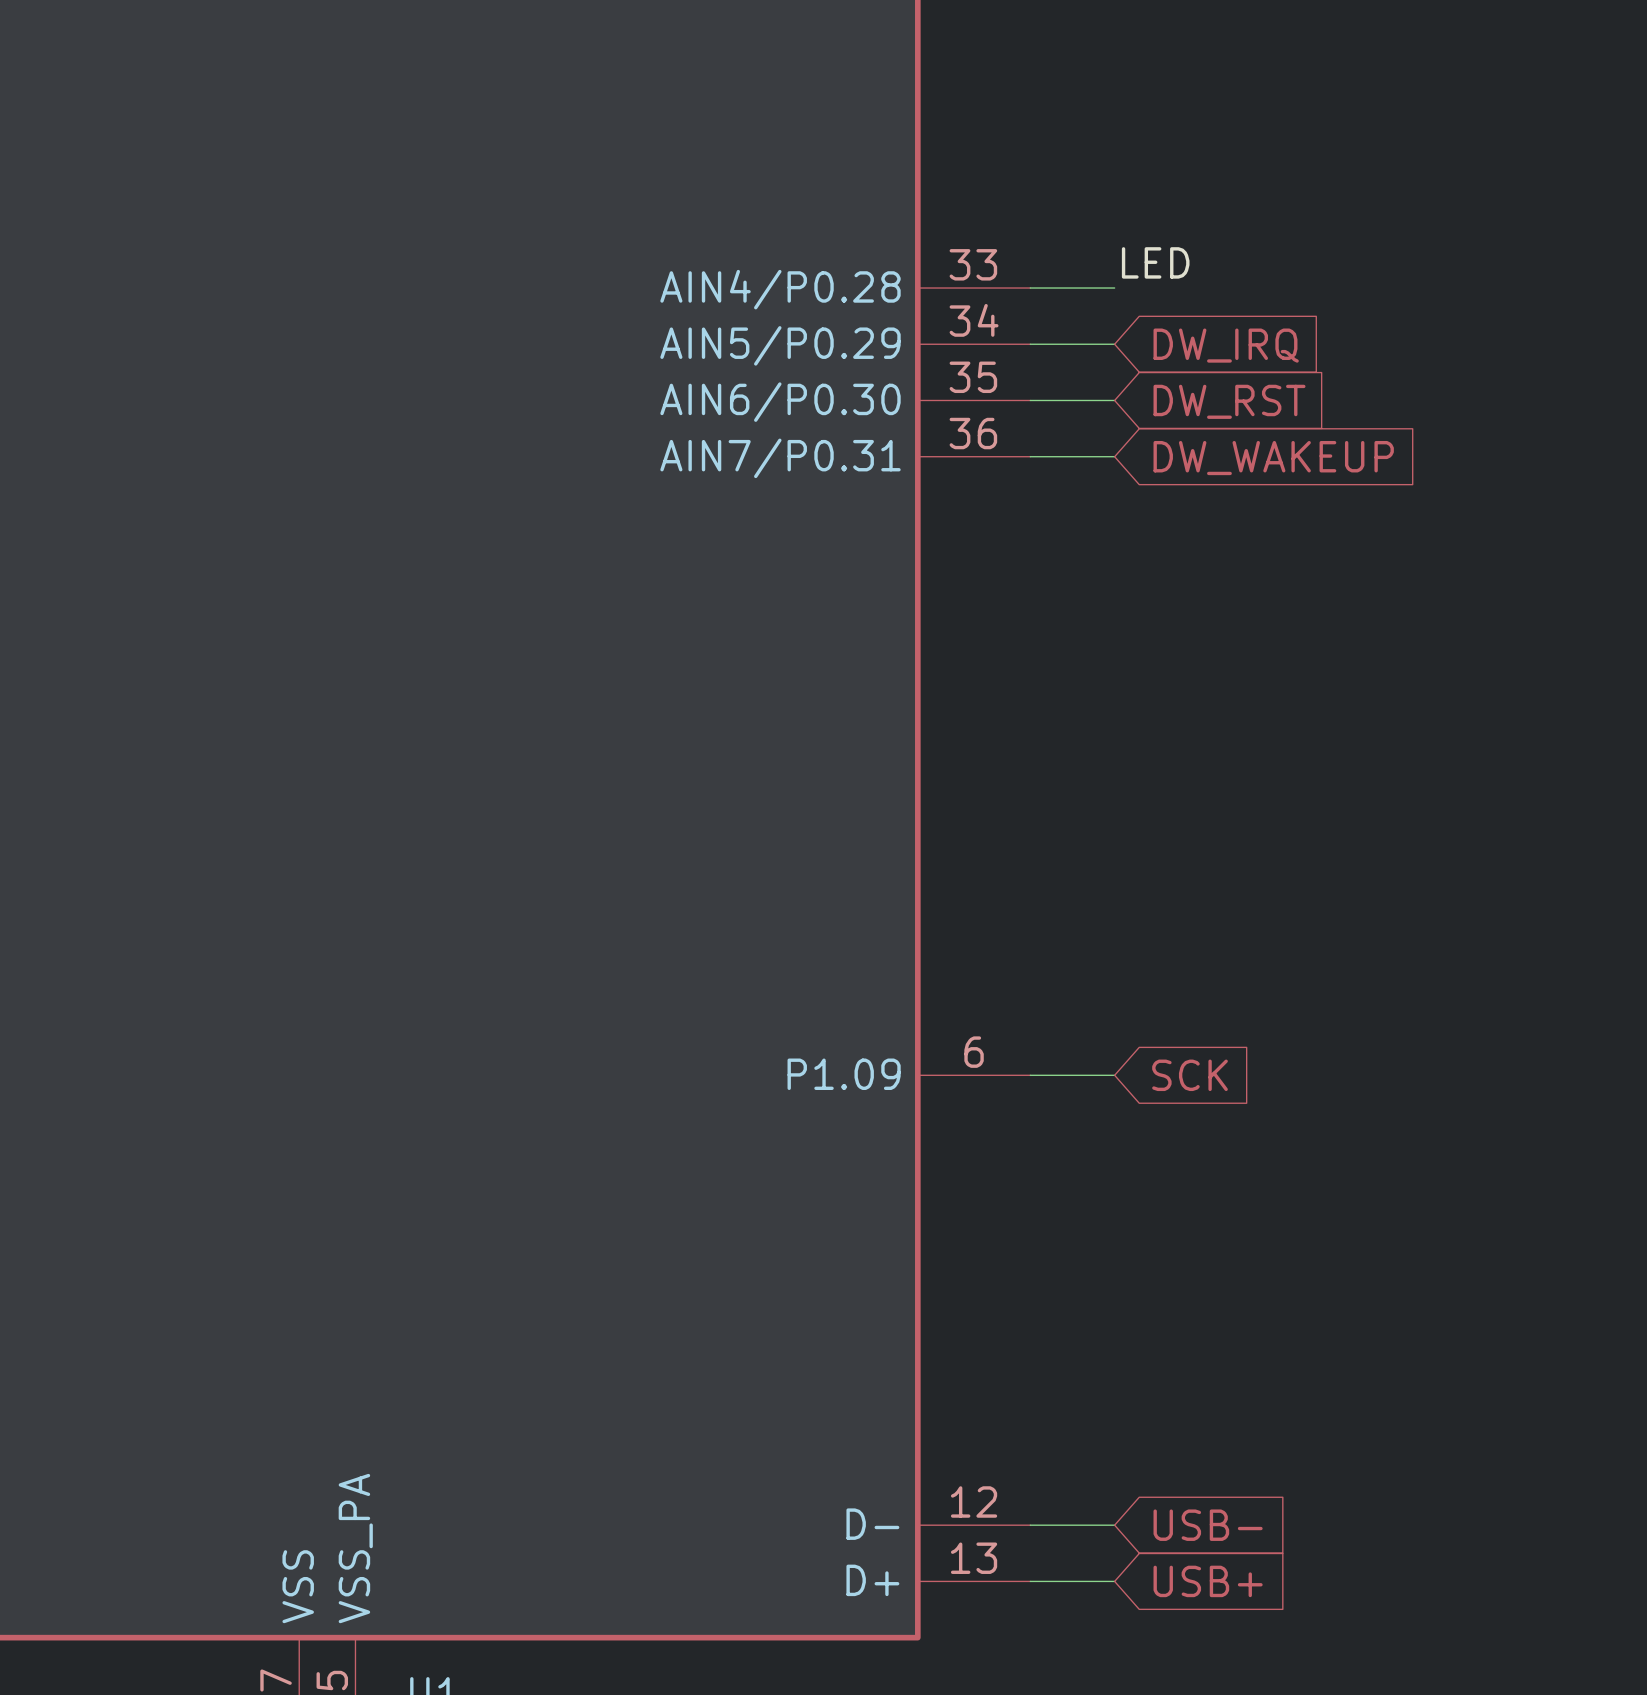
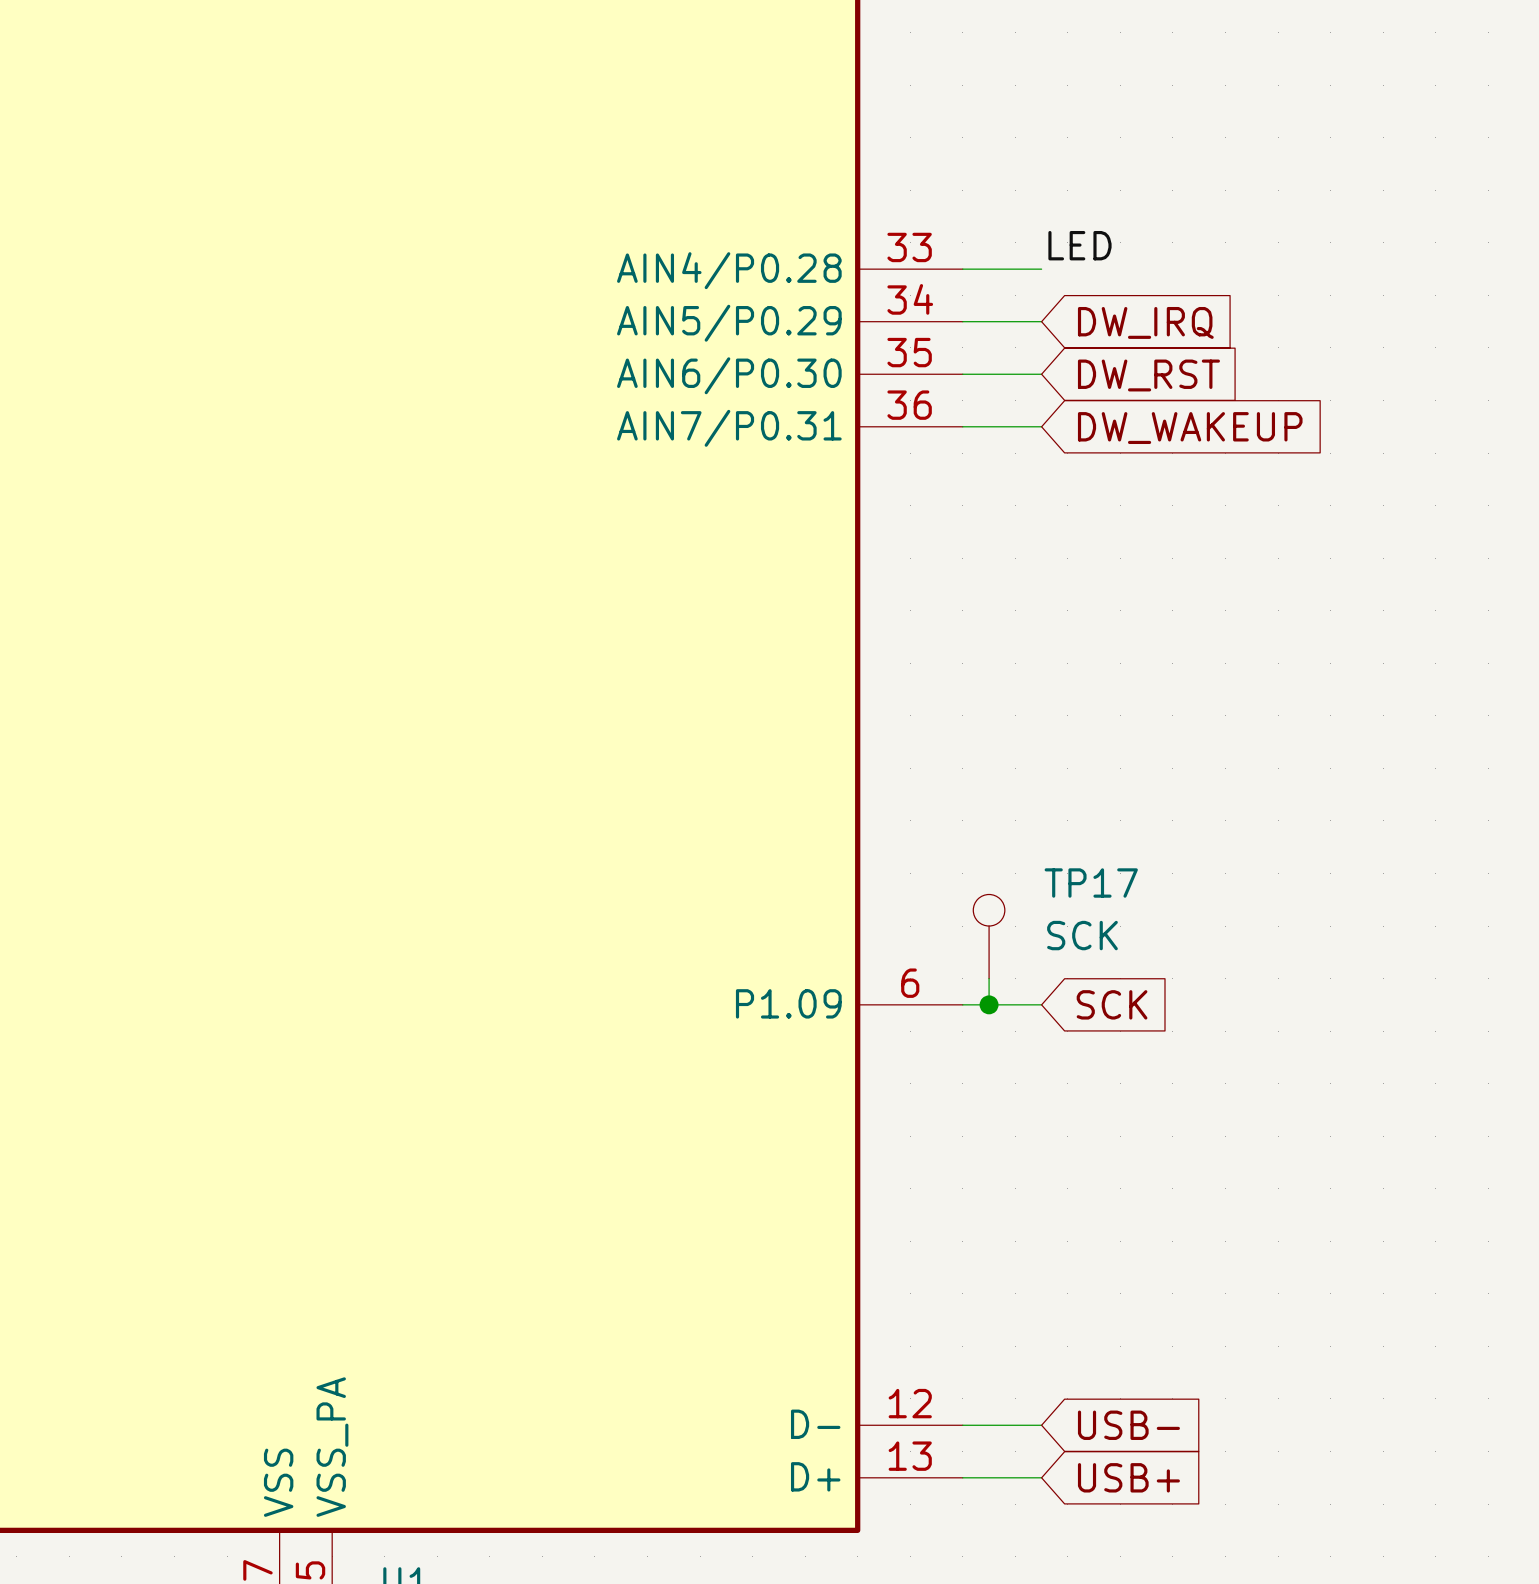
TP17: none -> SCK (989, 936)
wire: none -> (989, 978) (989, 1004)
junction: none -> (989, 1004)

